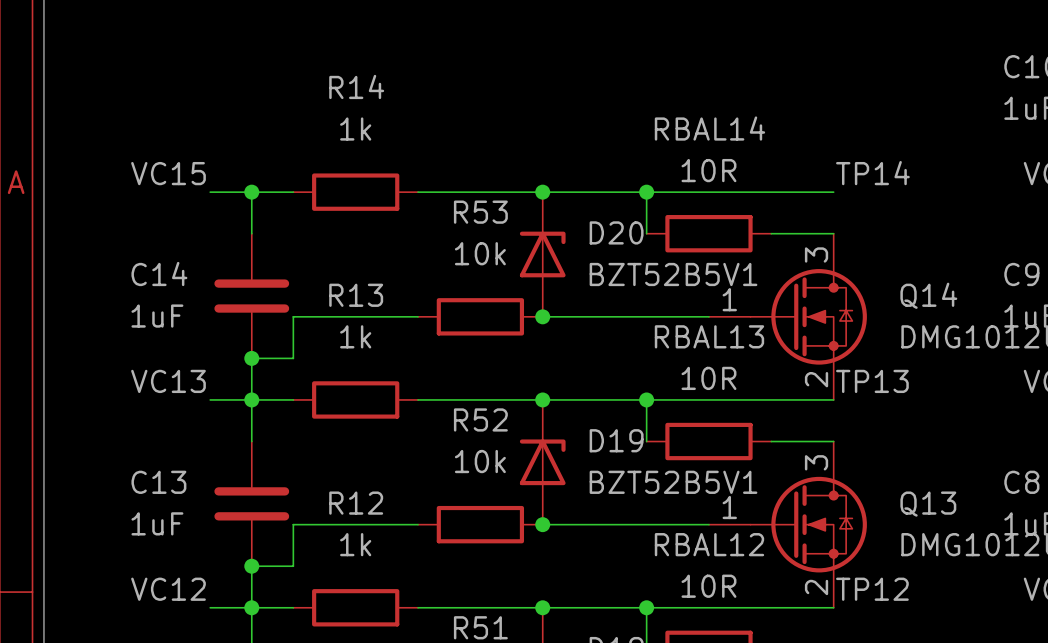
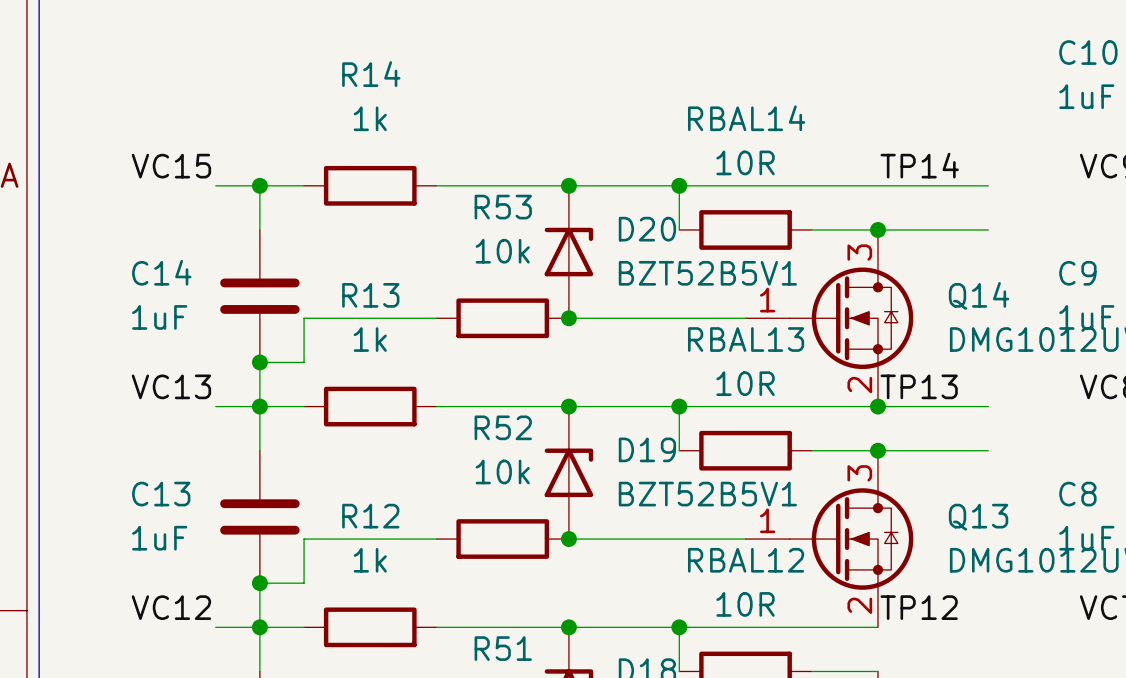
wire: none -> (877, 185) (988, 185)
wire: none -> (877, 229) (988, 229)
junction: none -> (877, 229)
wire: none -> (877, 406) (988, 406)
junction: none -> (877, 406)
wire: none -> (877, 450) (988, 450)
junction: none -> (877, 450)

